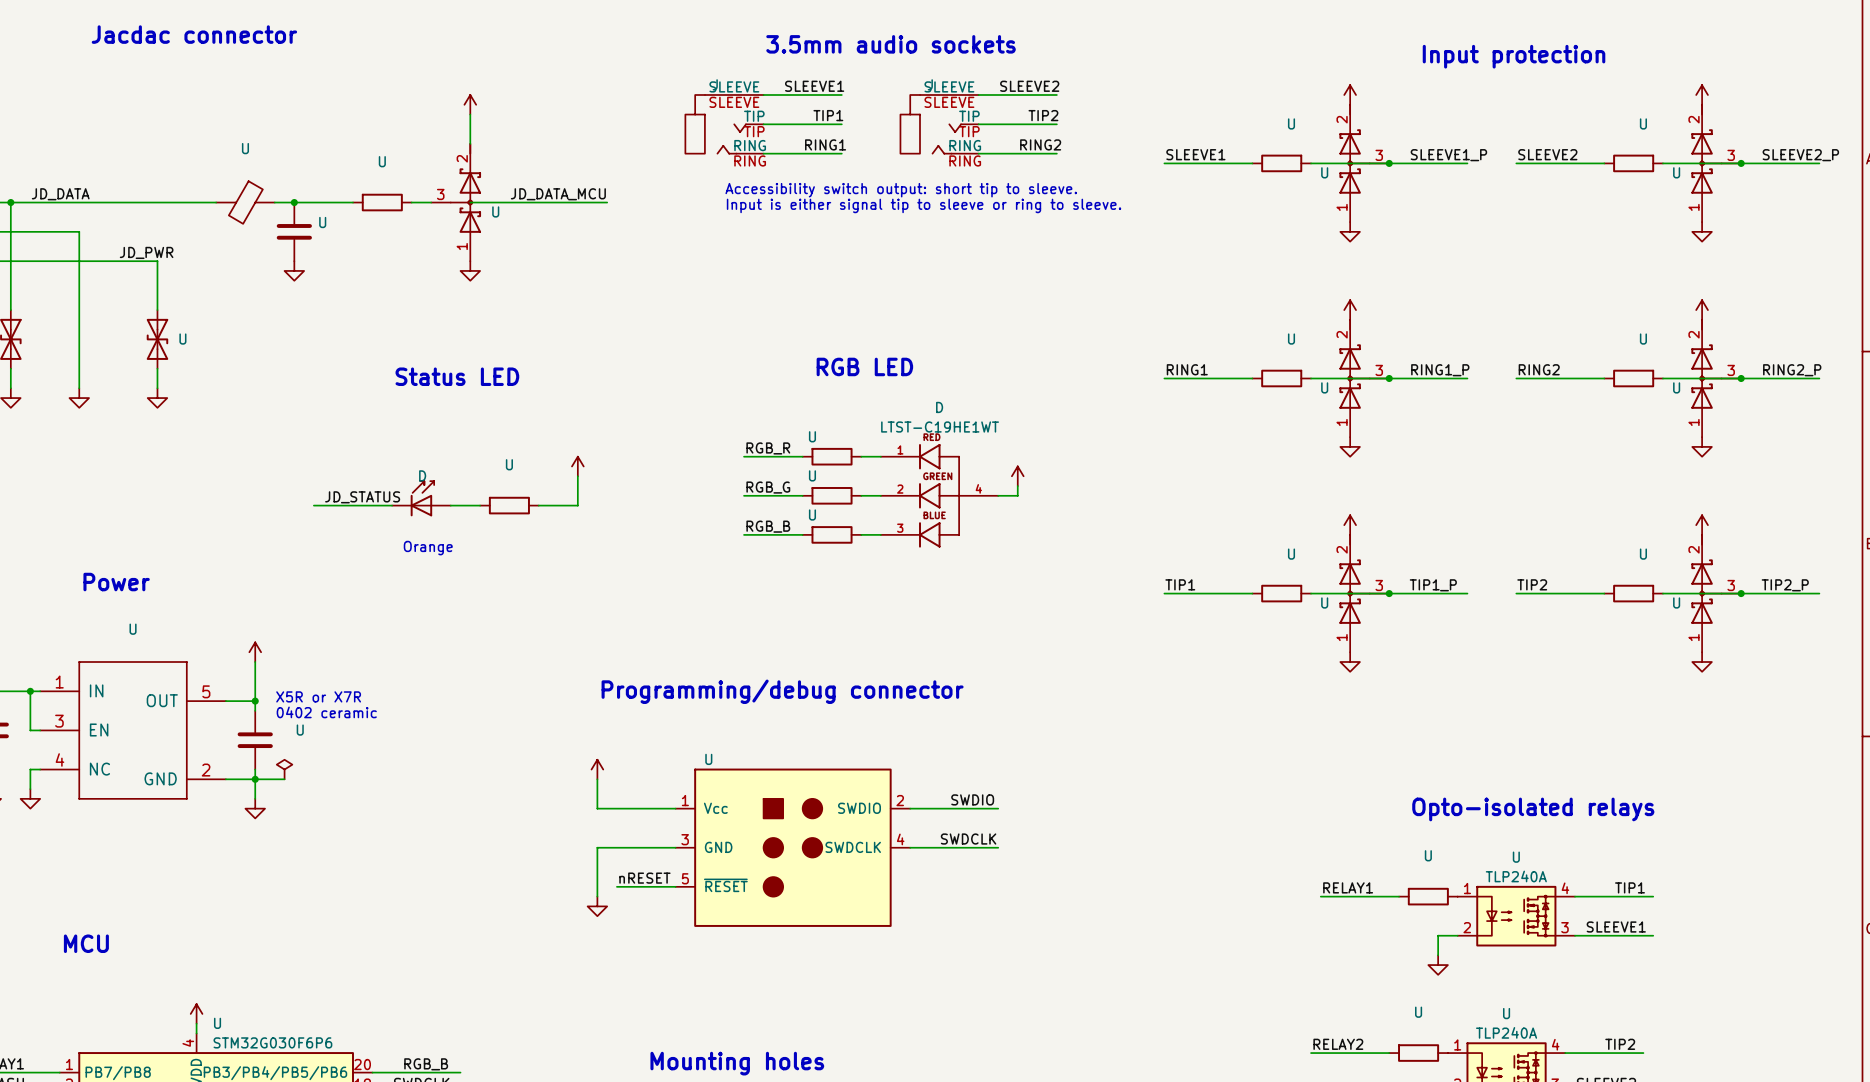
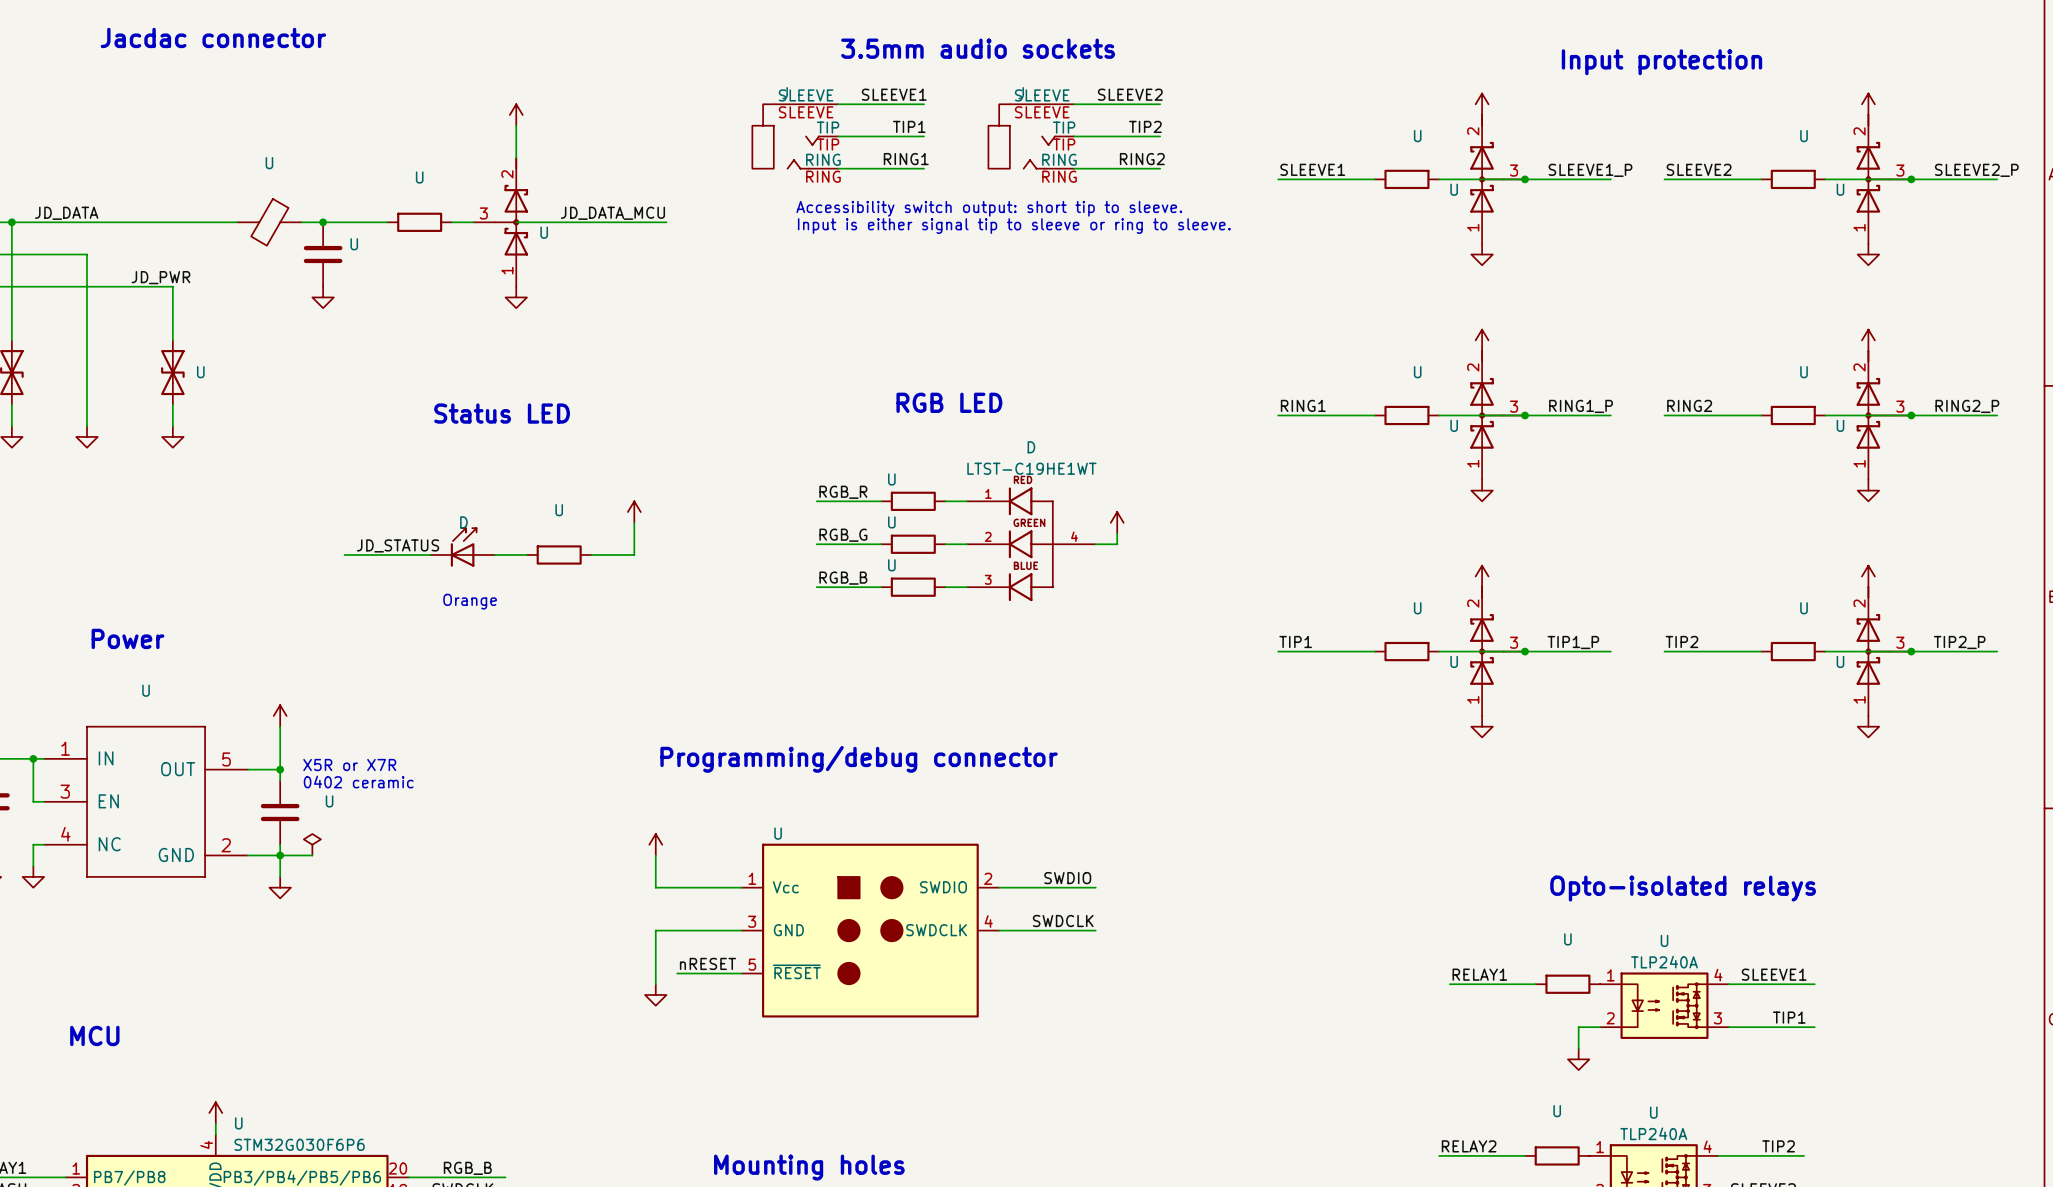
label position: TIP1 (1629, 887) -> TIP1 (1789, 1017)
label position: SLEEVE1 (1616, 927) -> SLEEVE1 (1774, 974)

